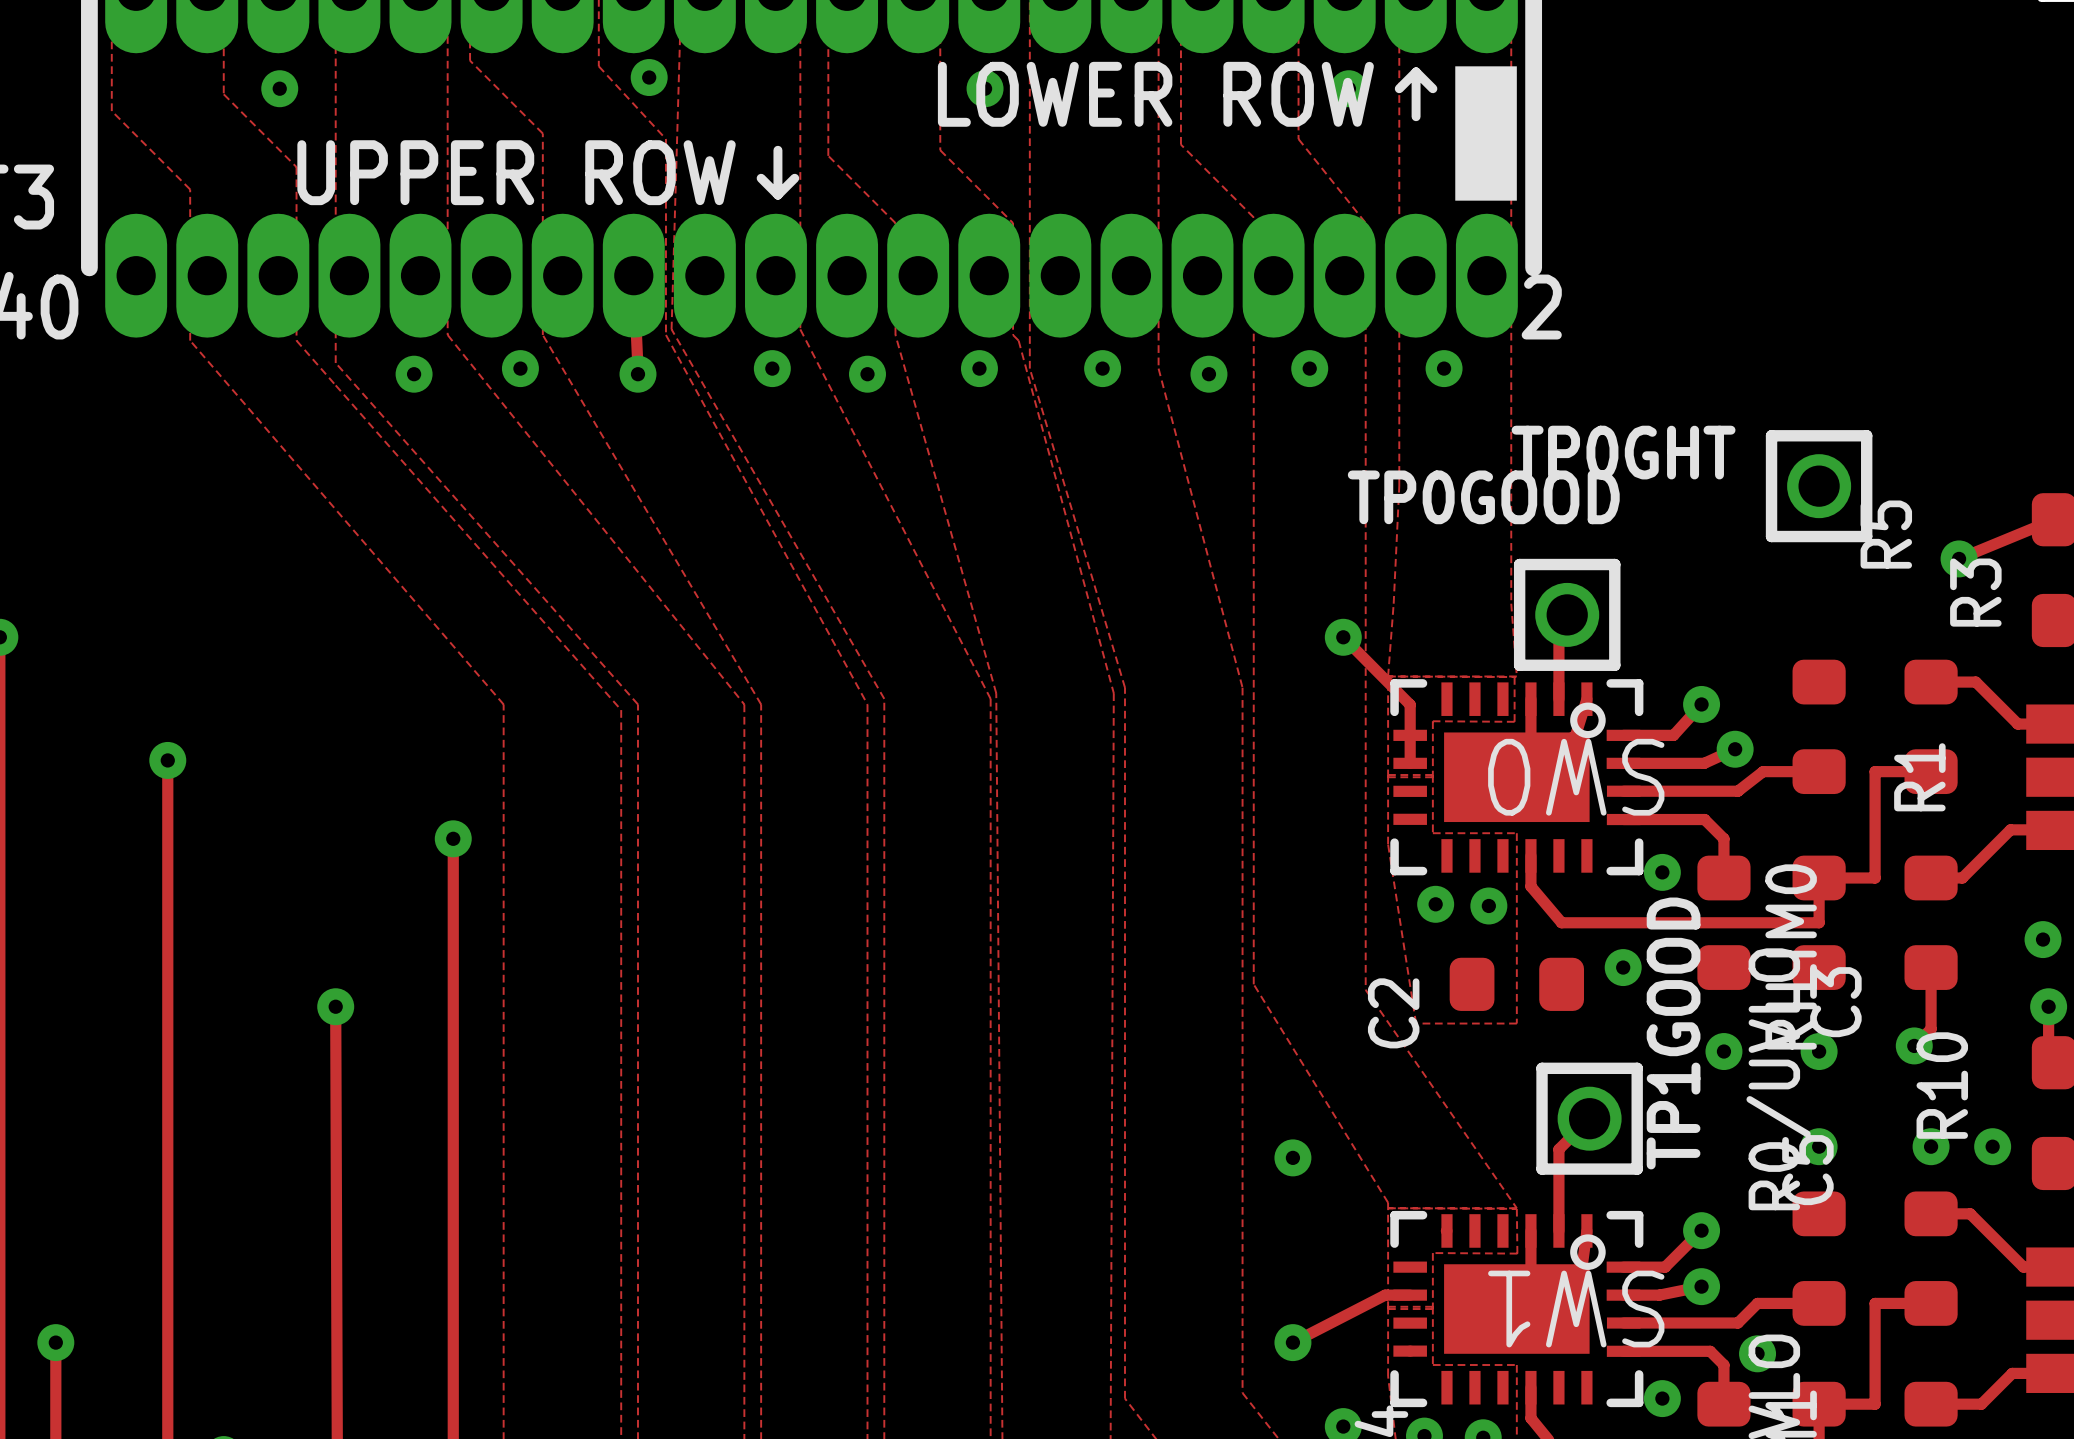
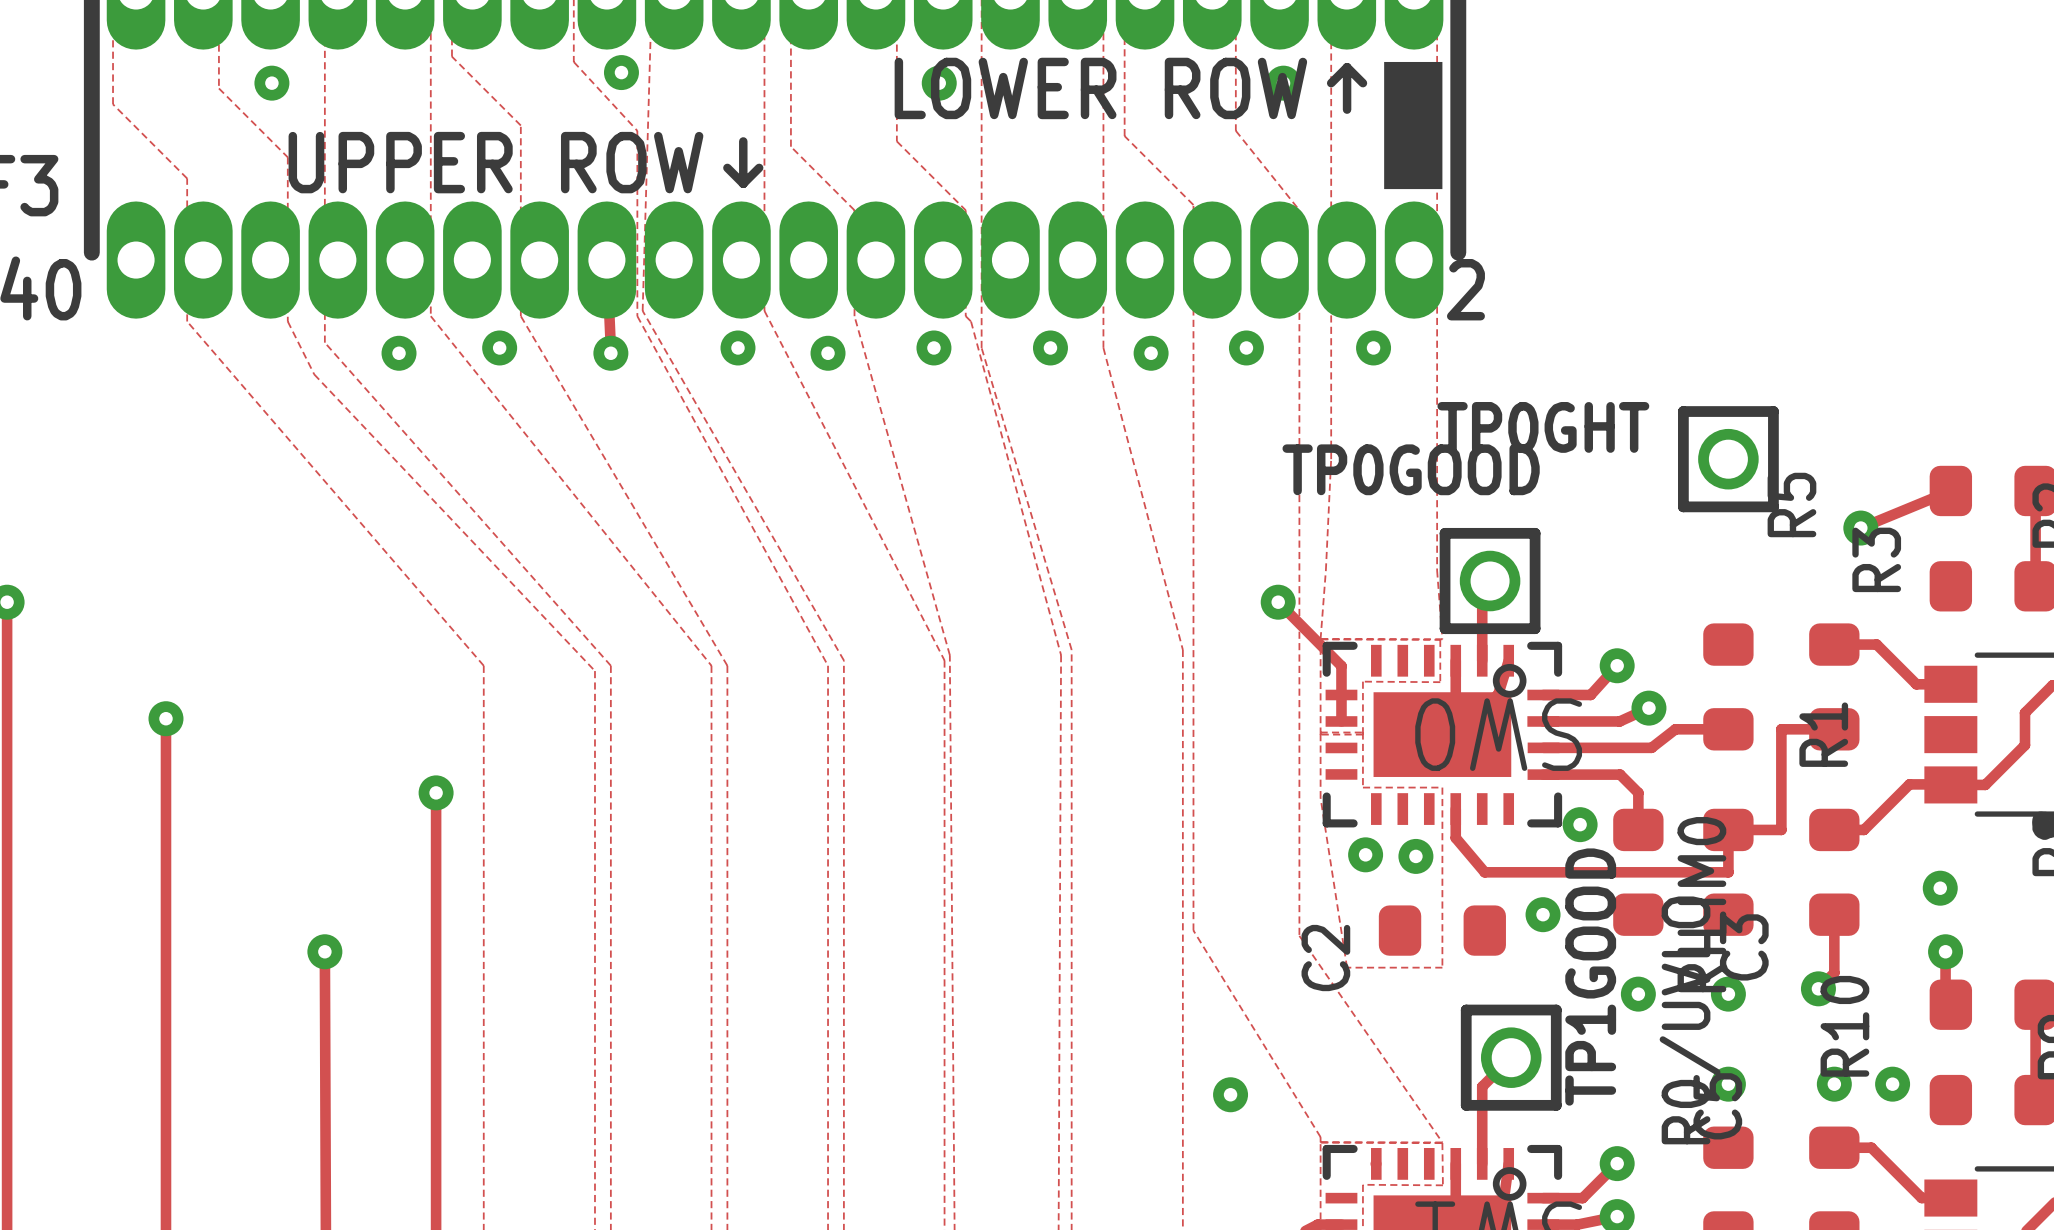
zone outline: (296, 340) (621, 710) -> (287, 321) (314, 374) (594, 671)

